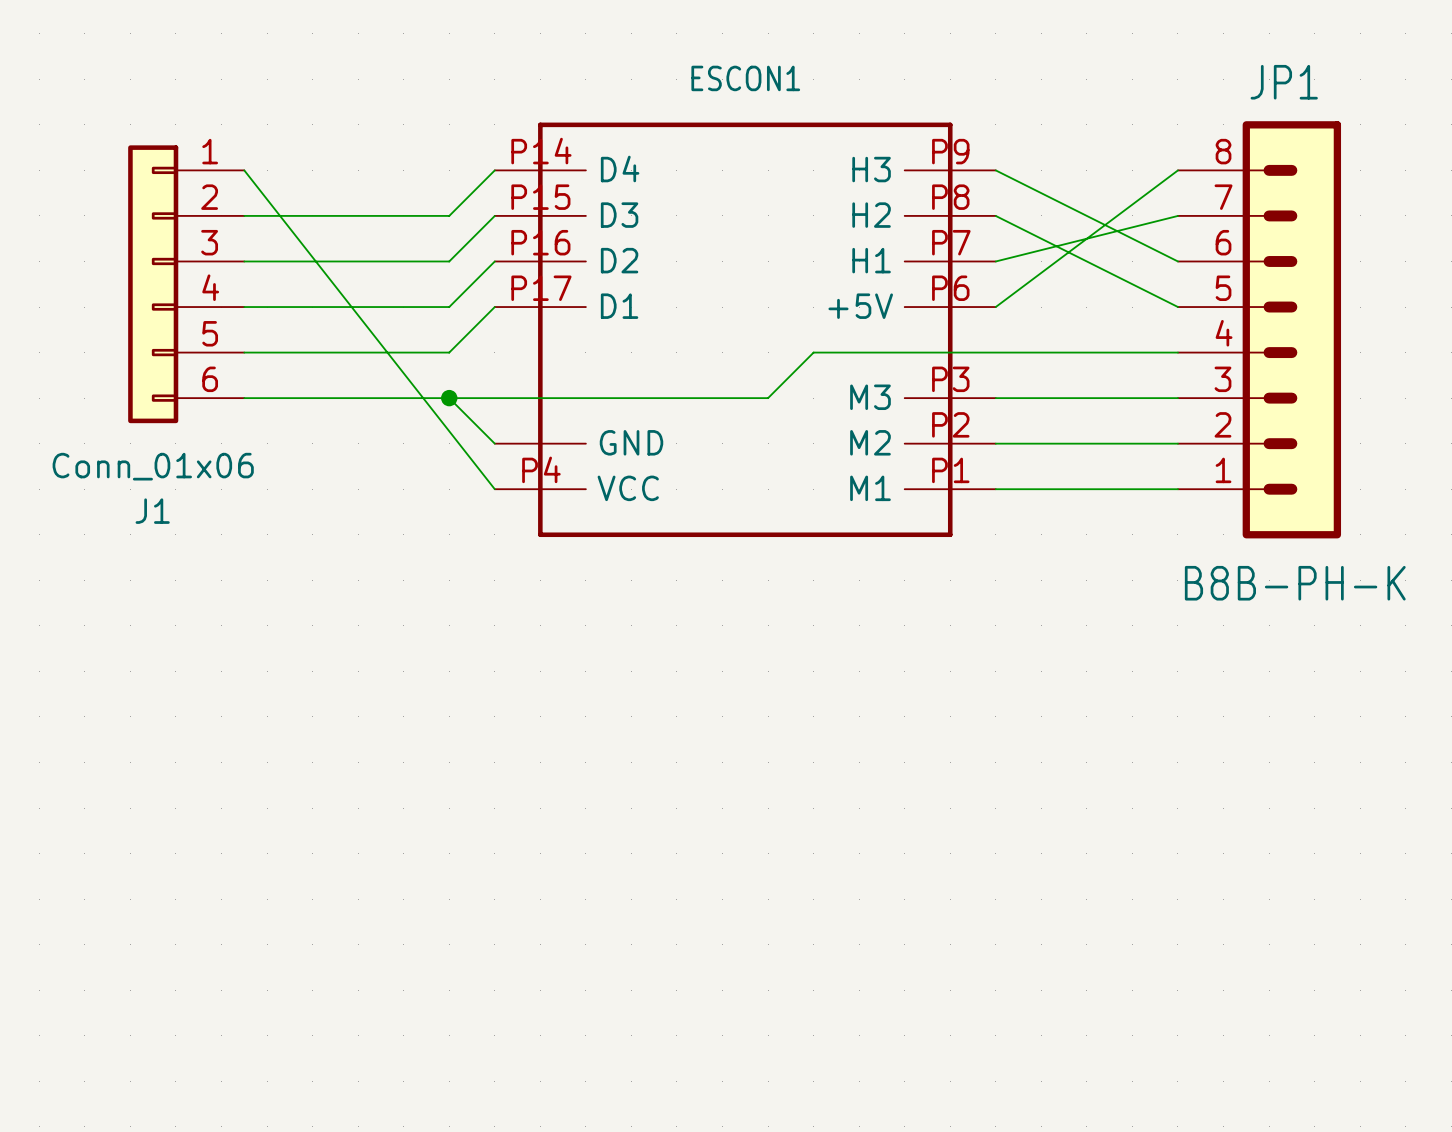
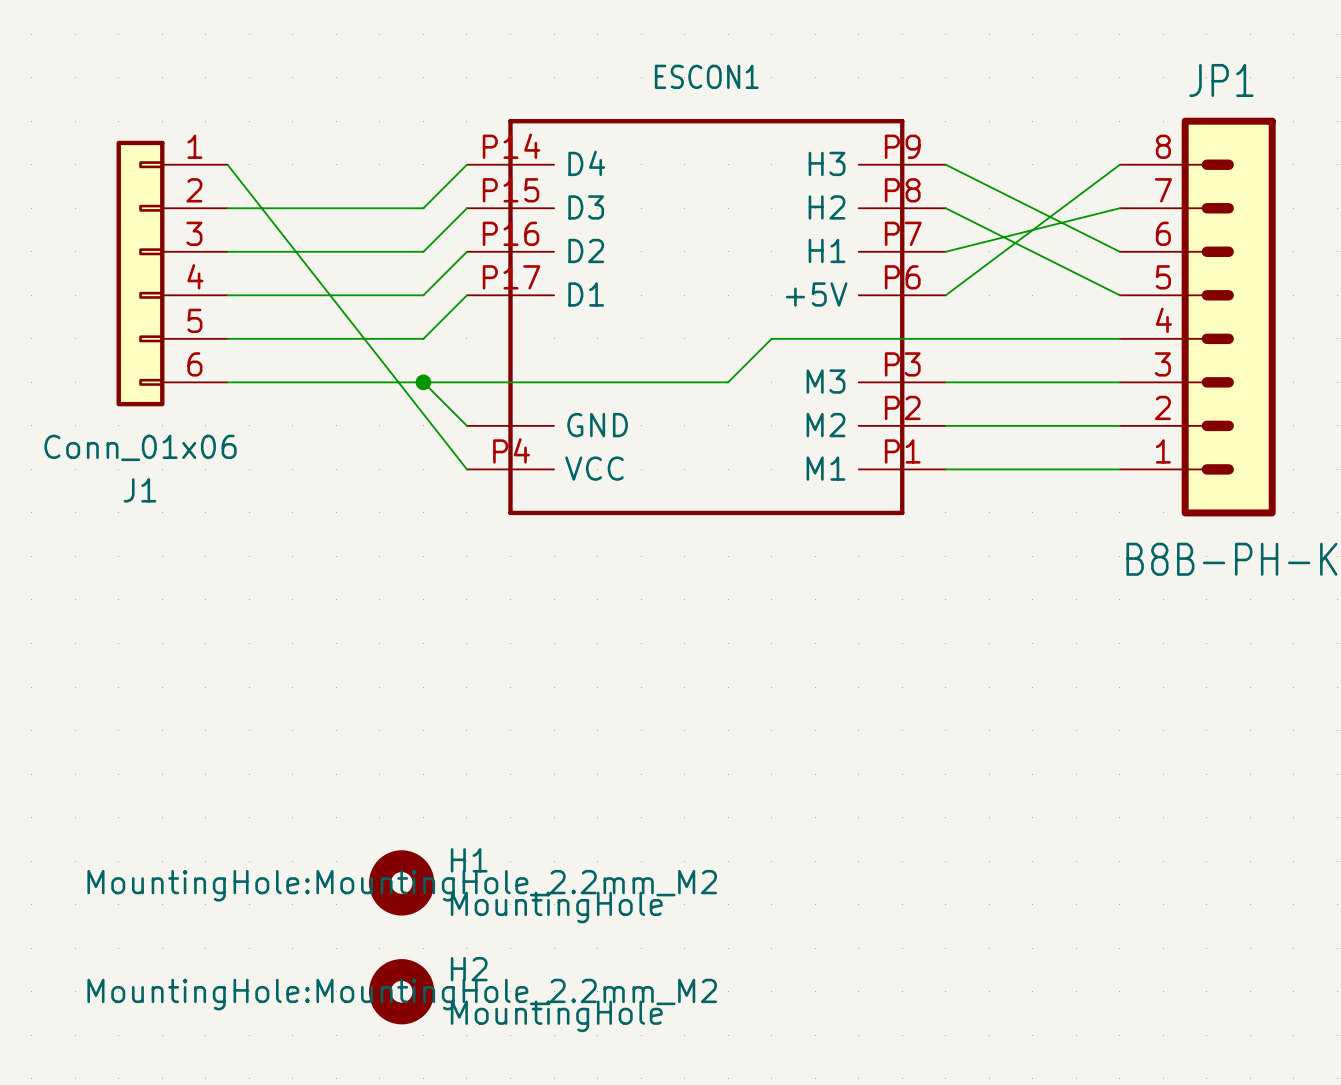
H1: none -> MountingHole (401, 882)
H2: none -> MountingHole (401, 991)

